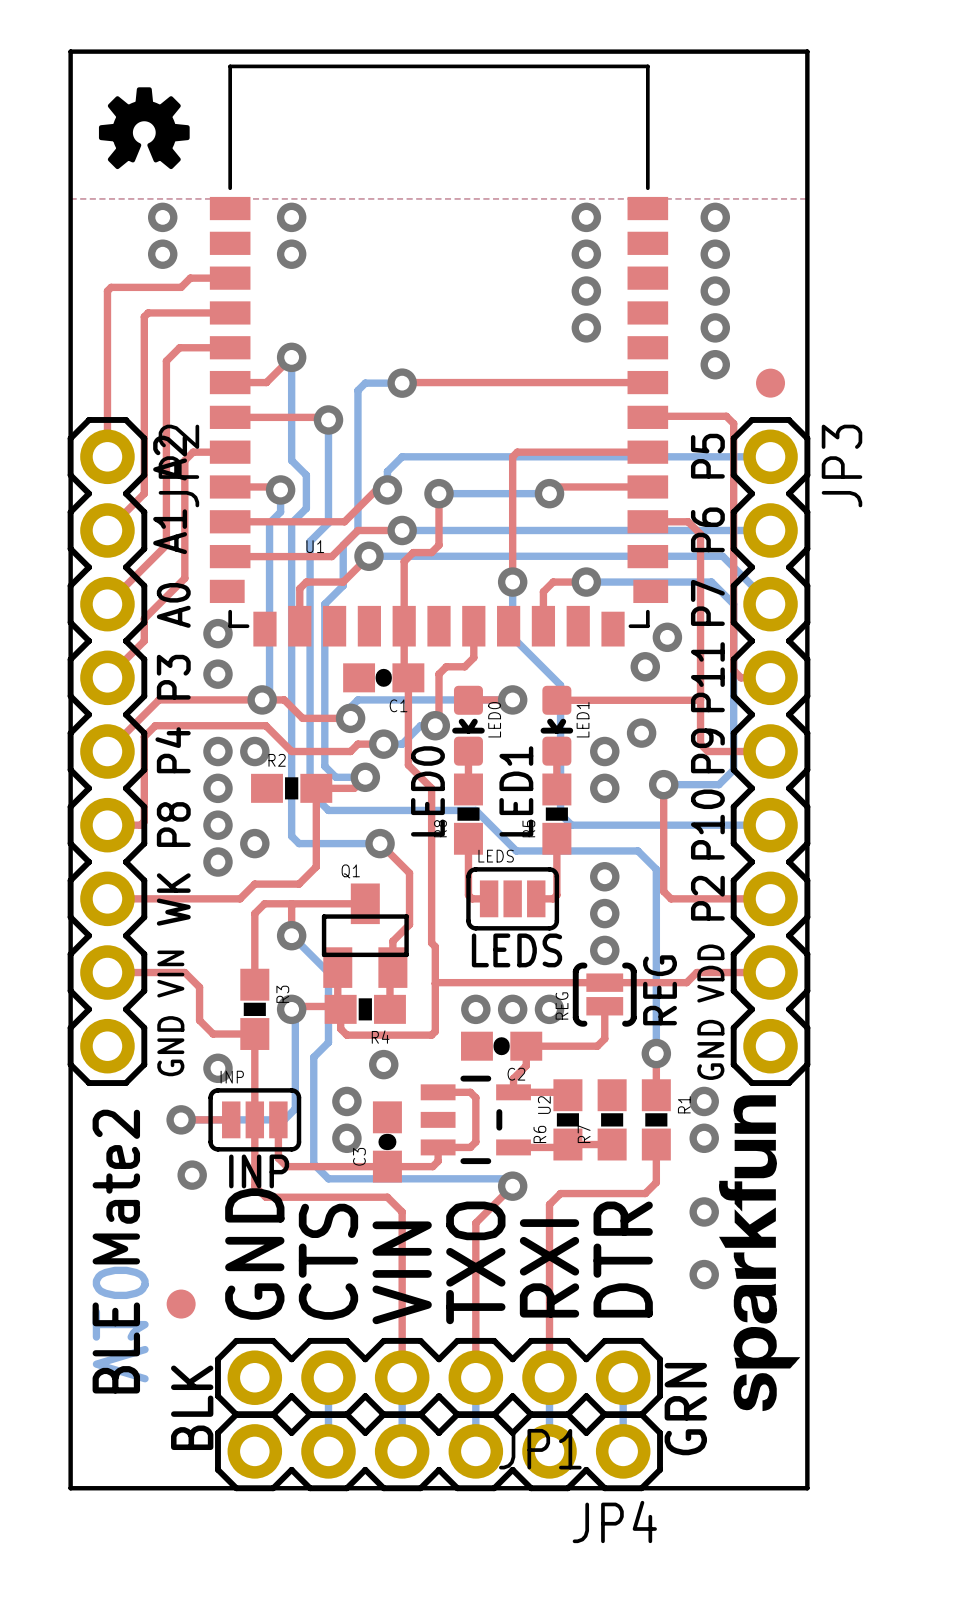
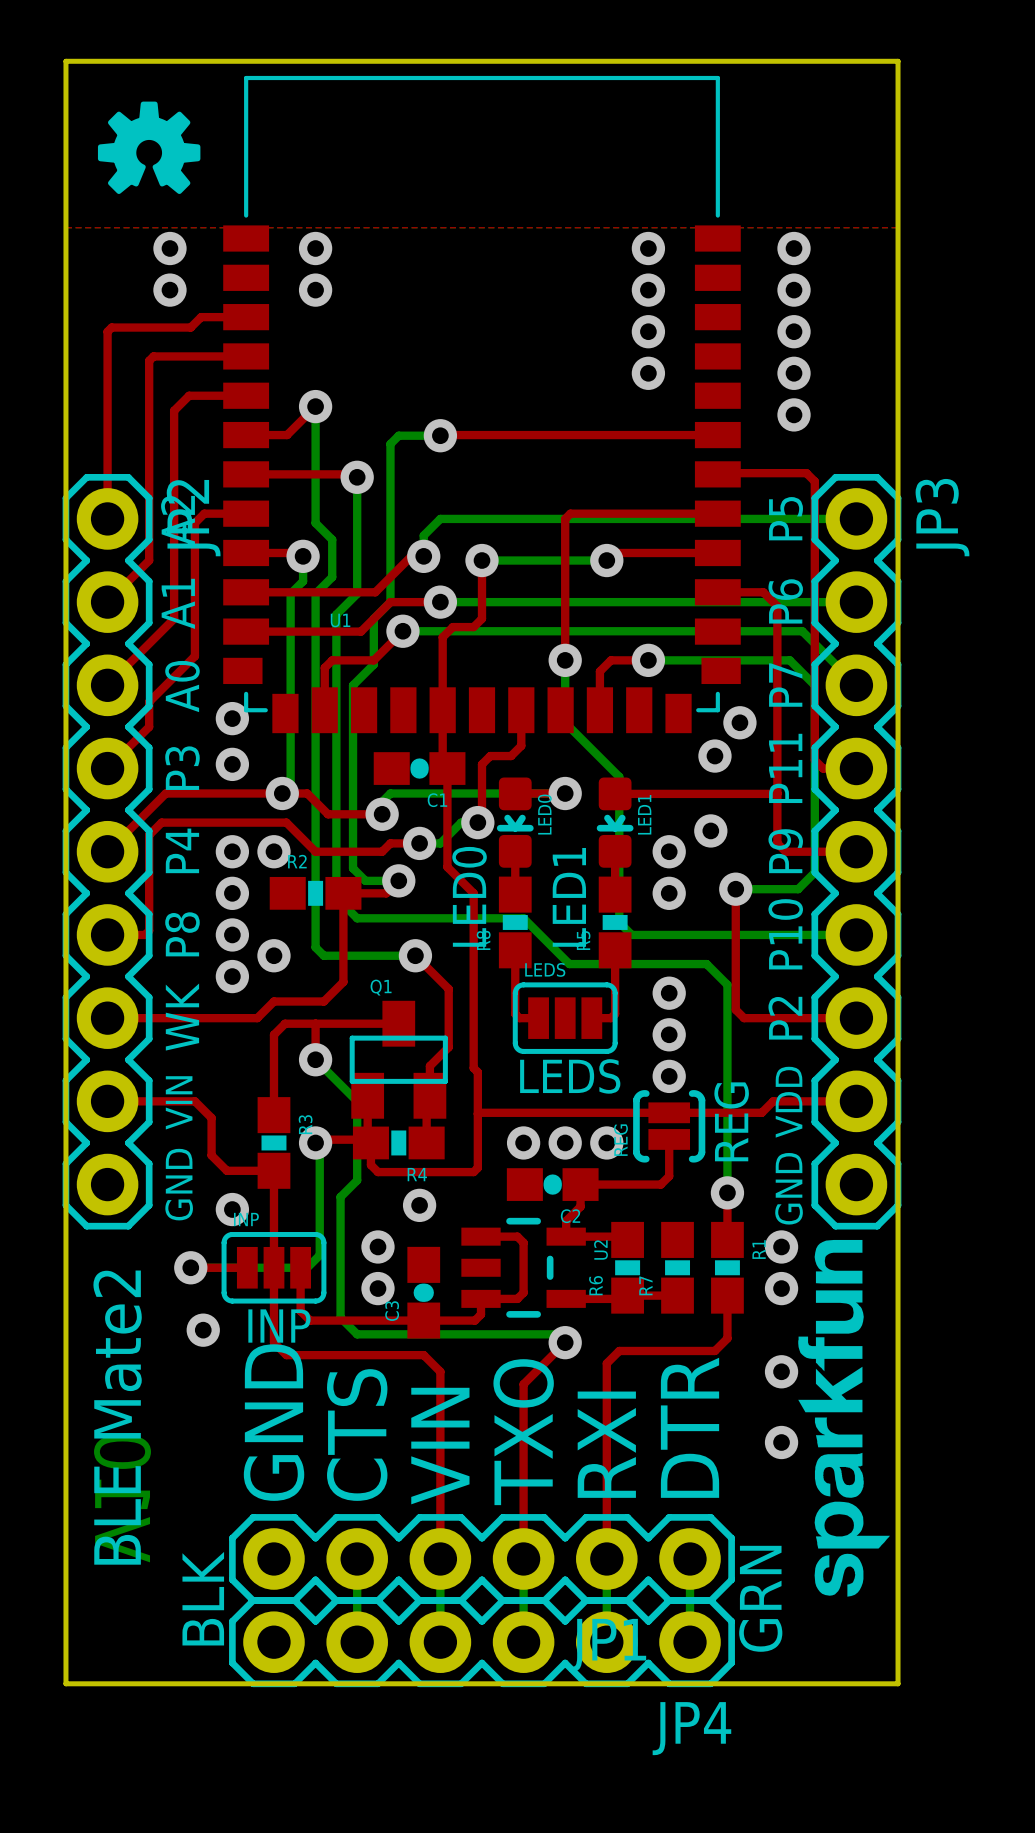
part: (770, 383) -> none
part: (181, 1304) -> none

